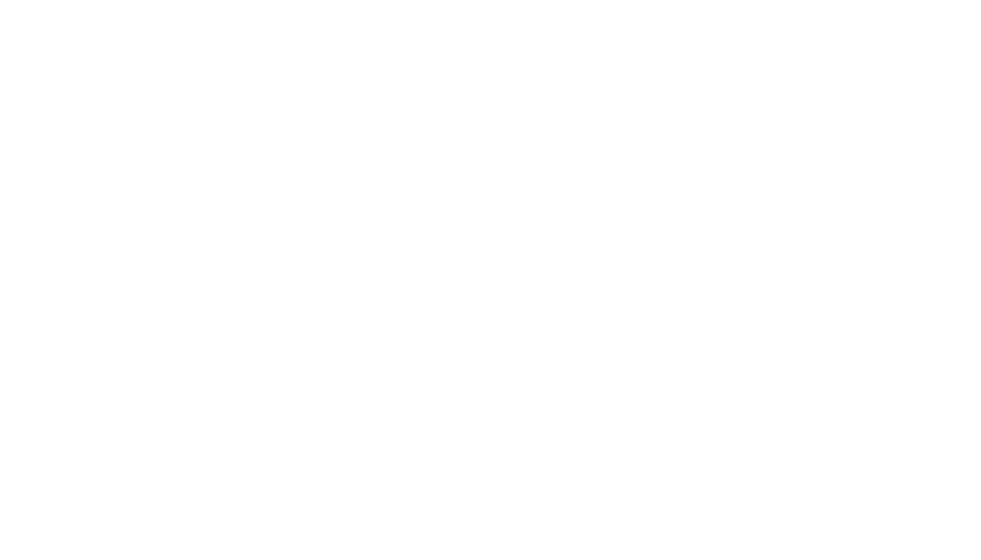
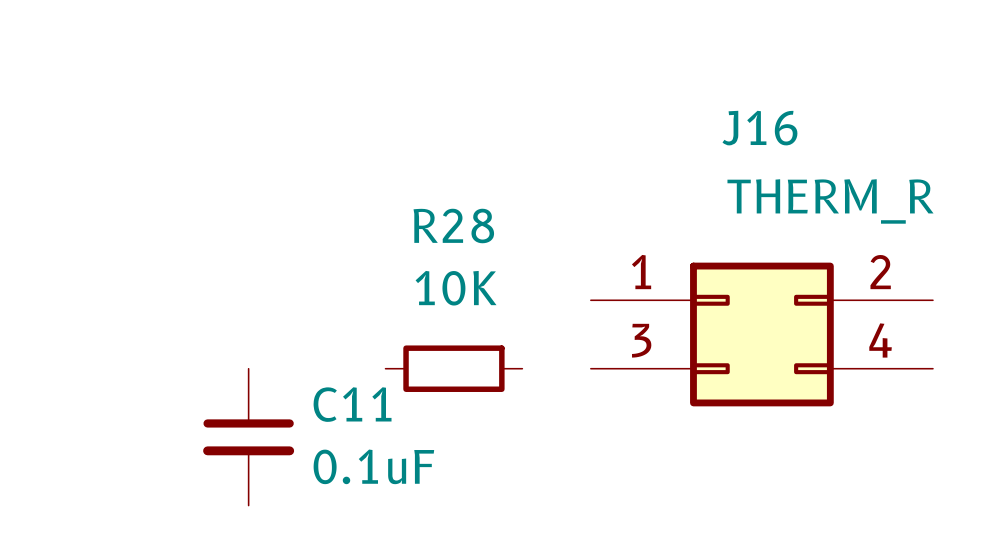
J16: none -> THERM_R (761, 334)
R28: none -> 10K (453, 368)
C11: none -> 0.1uF (248, 437)

